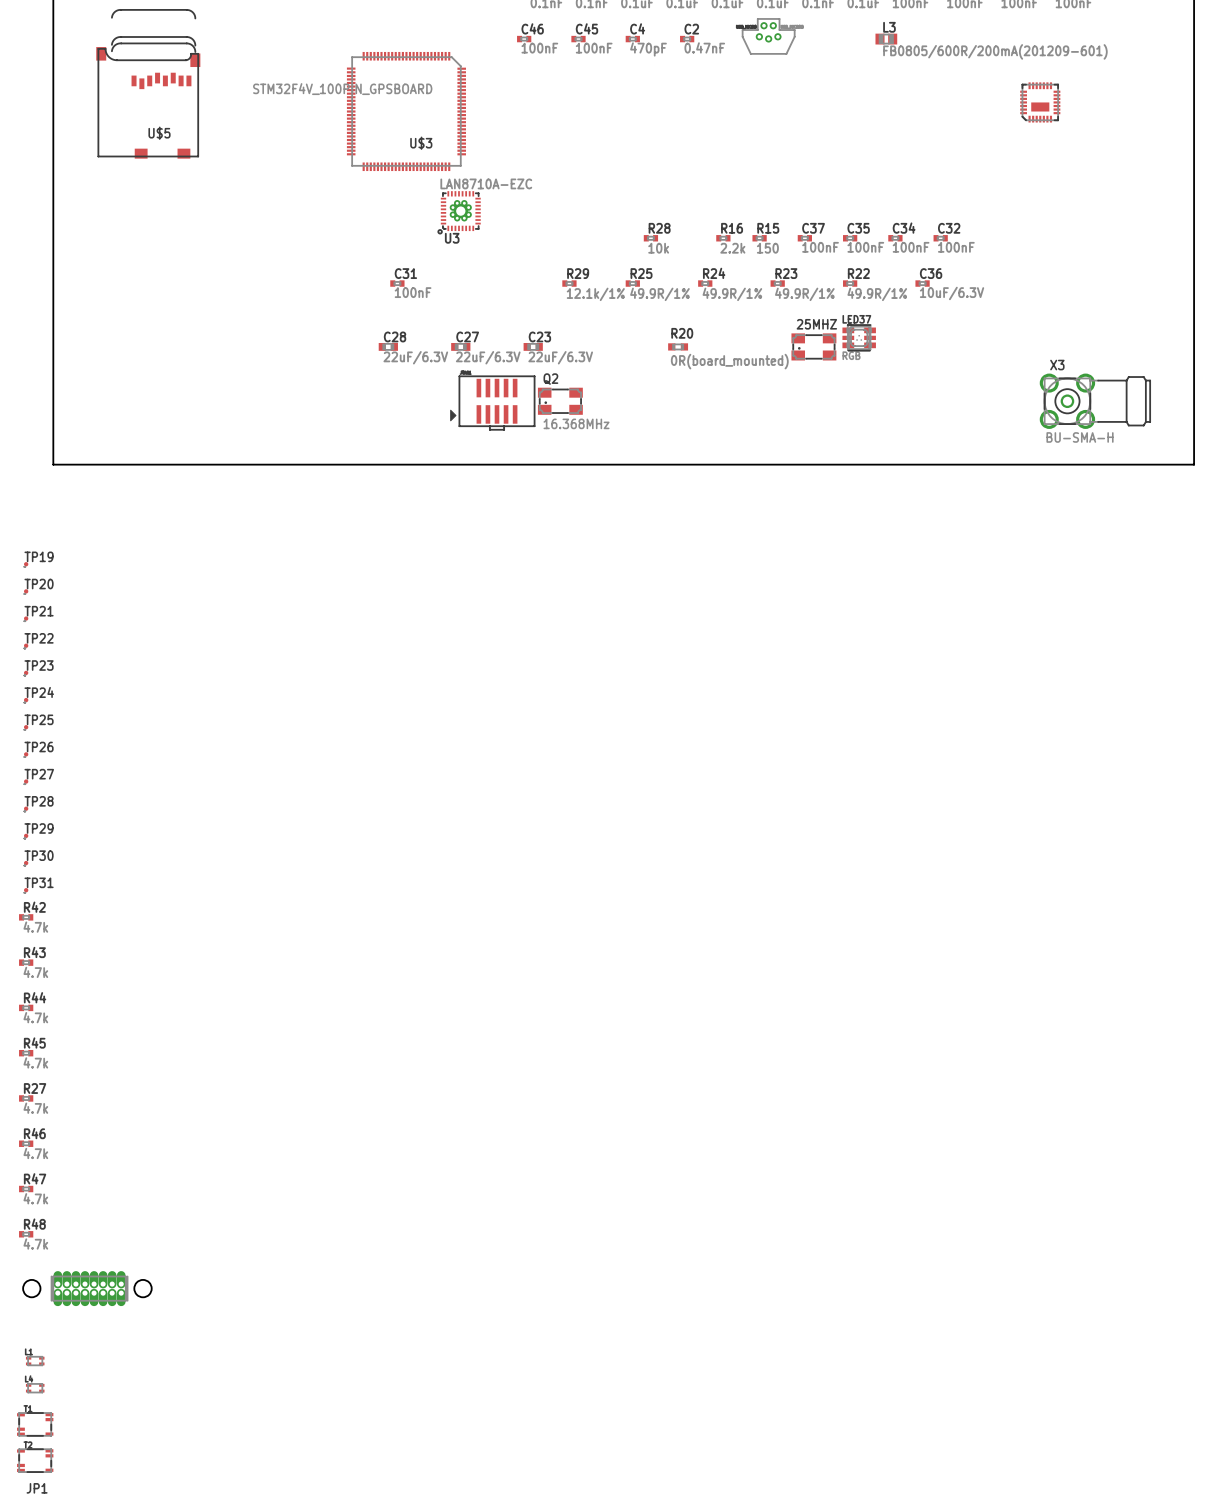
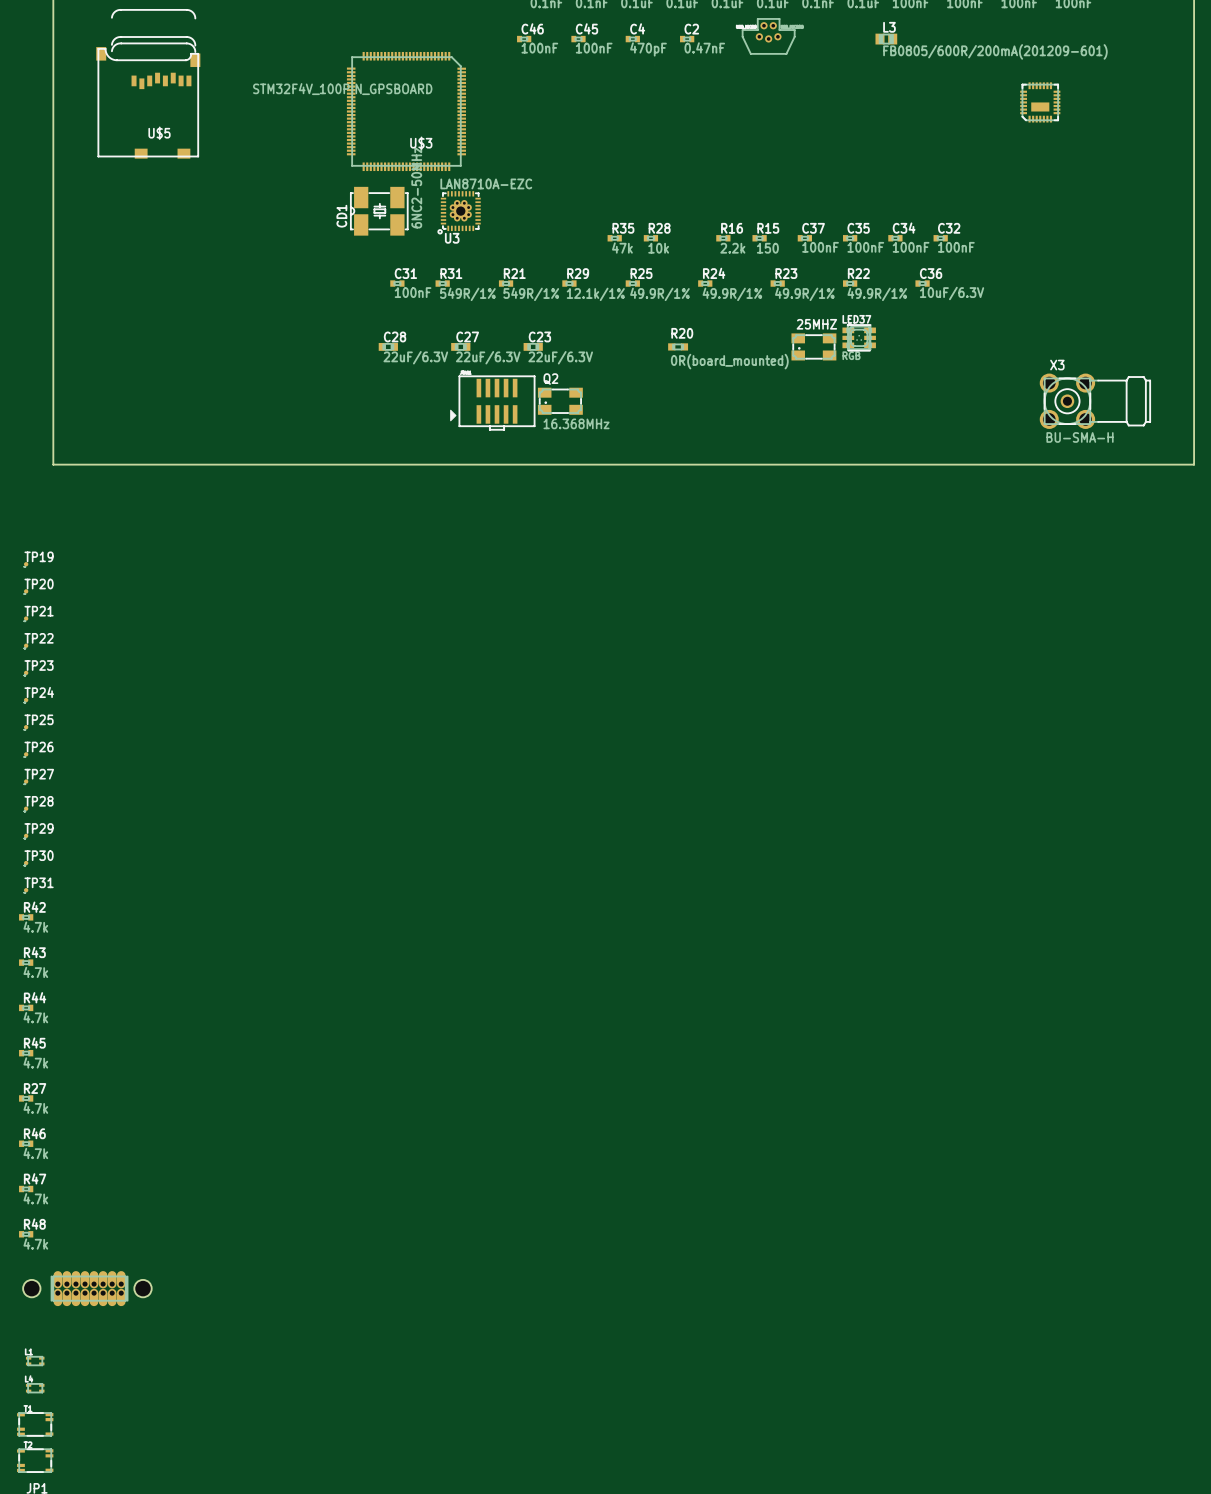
CD1: none -> 6NC2-50MHz (379, 211)
R35: none -> 47k (614, 238)
R31: none -> 549R/1% (442, 283)
R21: none -> 549R/1% (506, 283)

